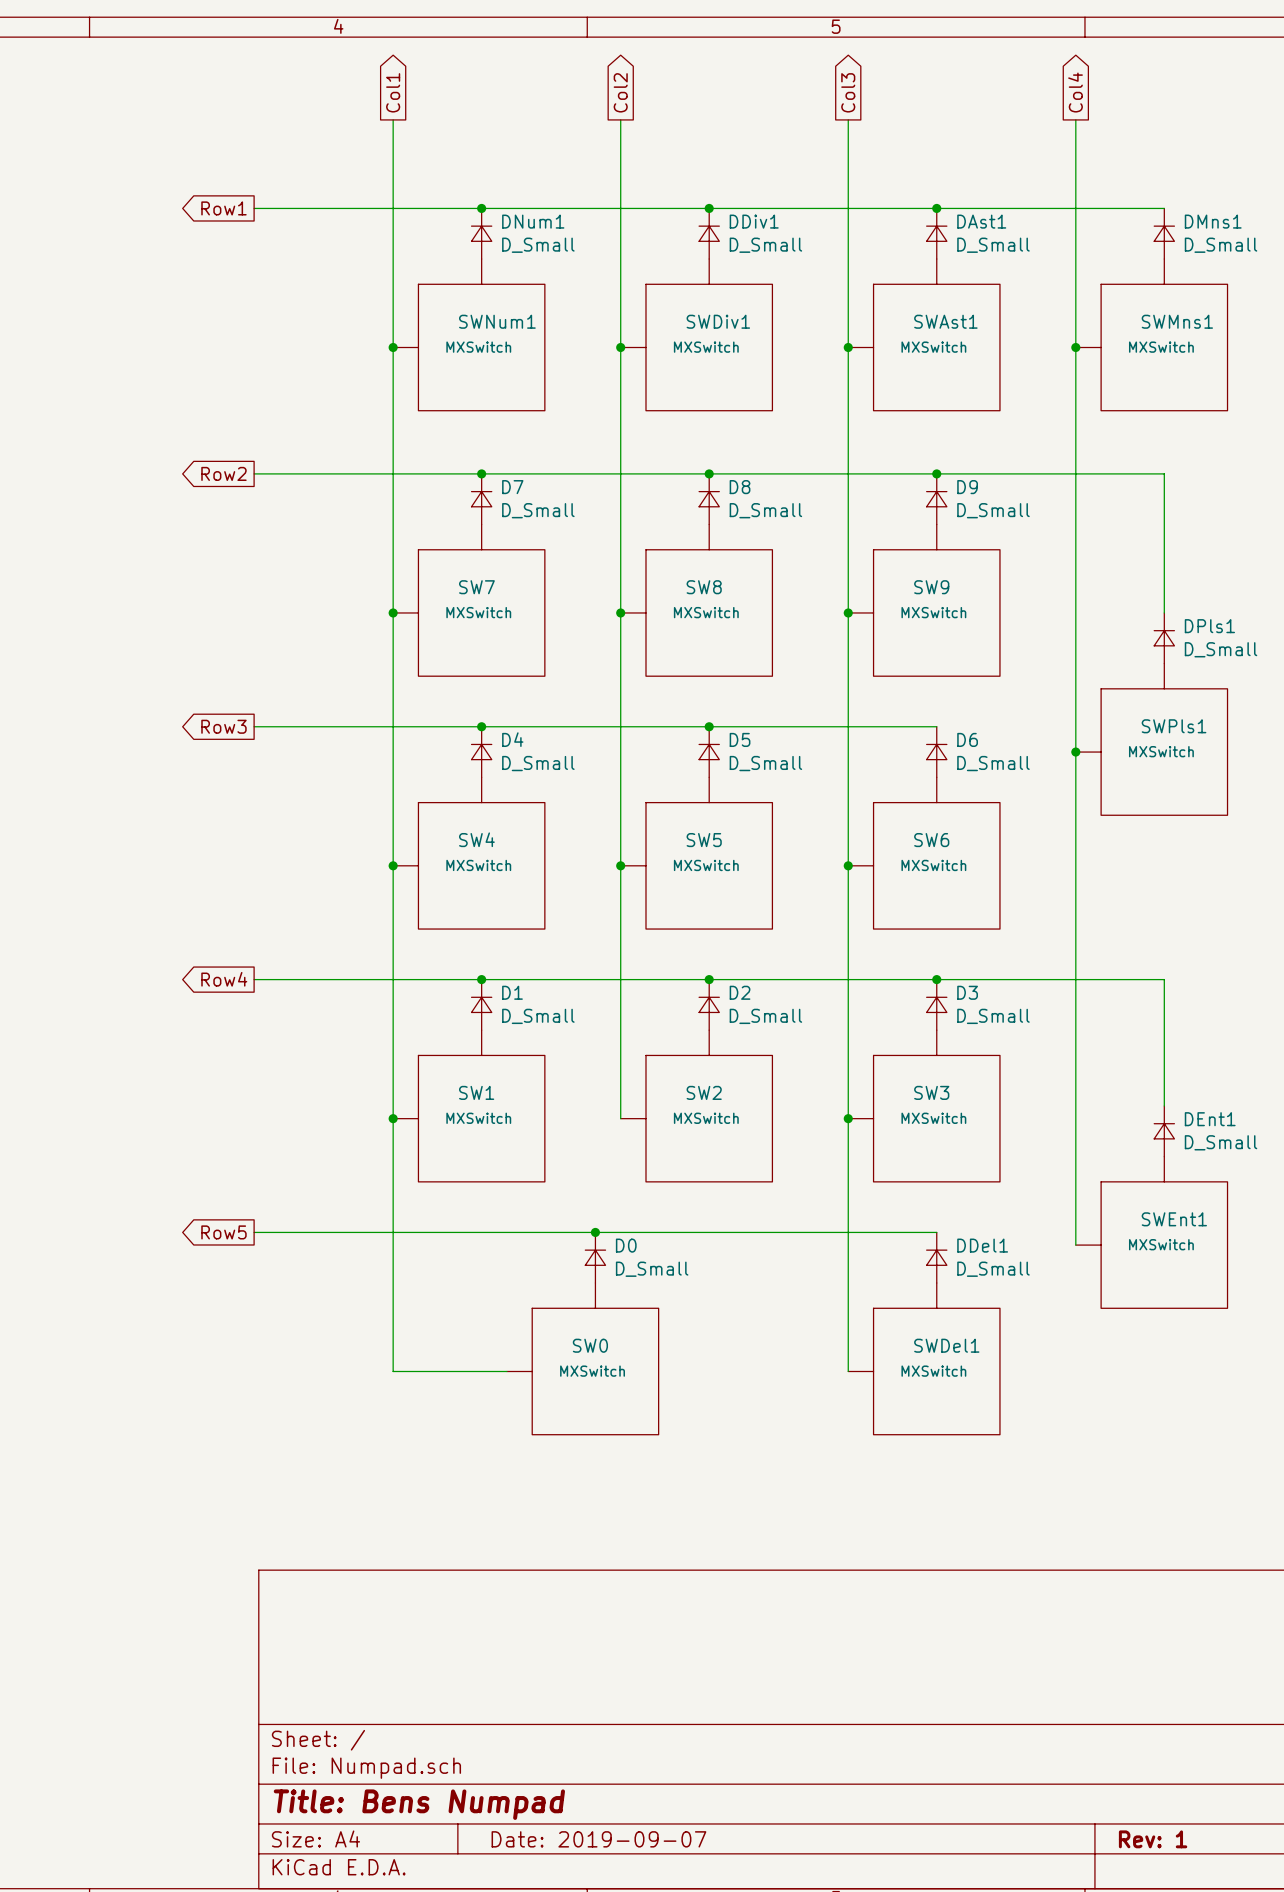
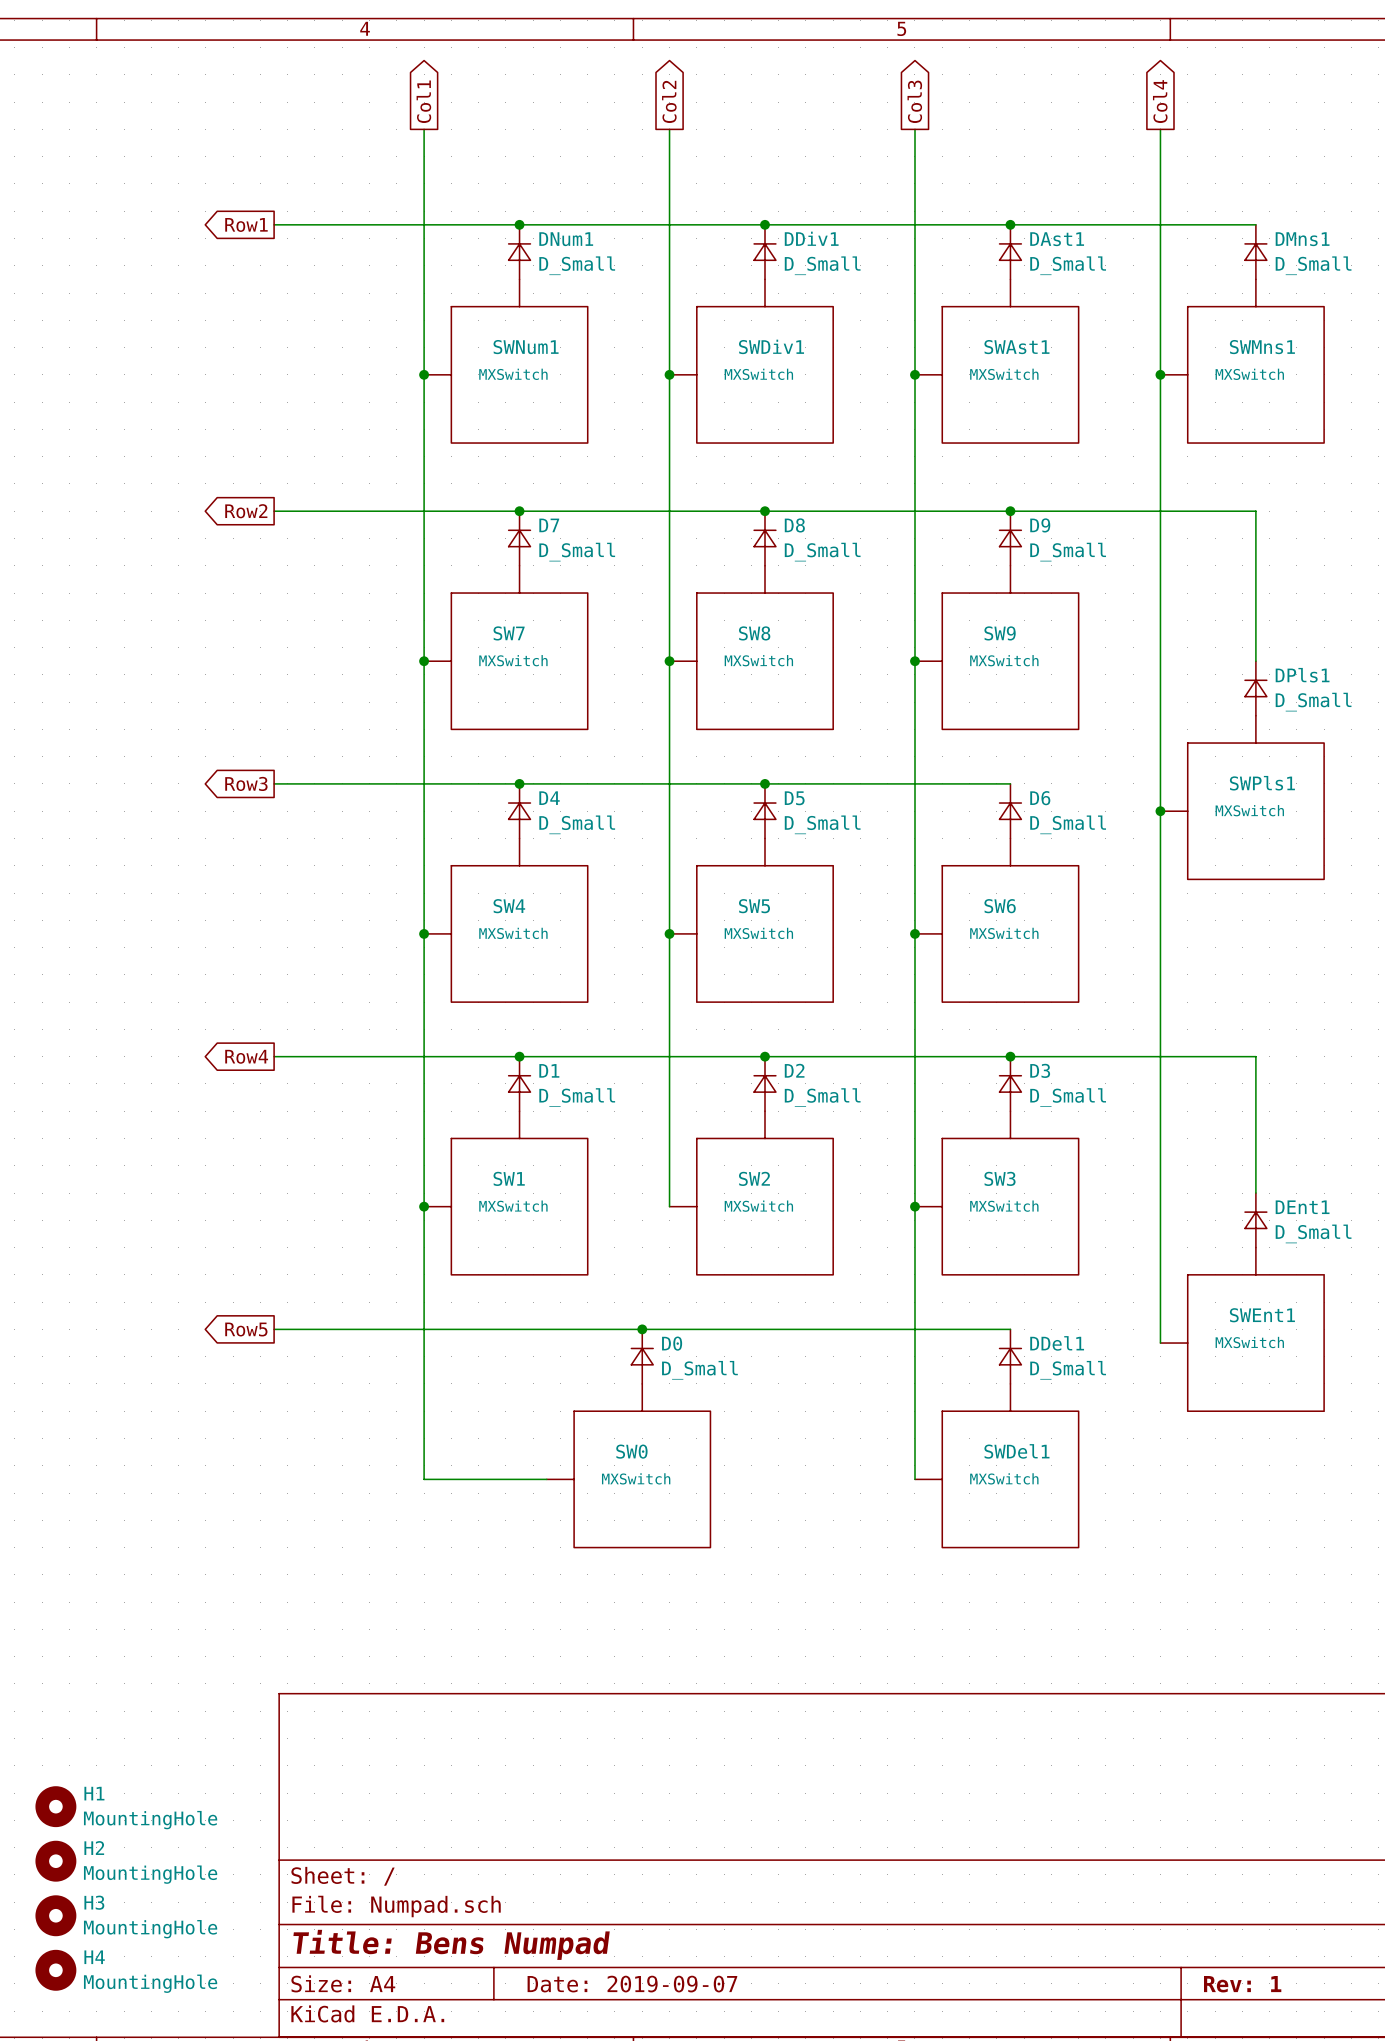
H1: none -> MountingHole (55, 1806)
H2: none -> MountingHole (55, 1861)
H3: none -> MountingHole (55, 1915)
H4: none -> MountingHole (55, 1970)

